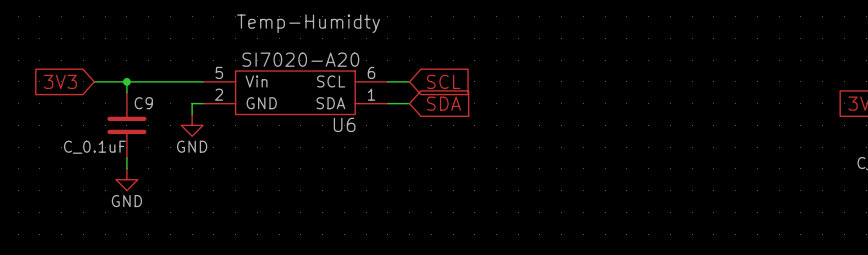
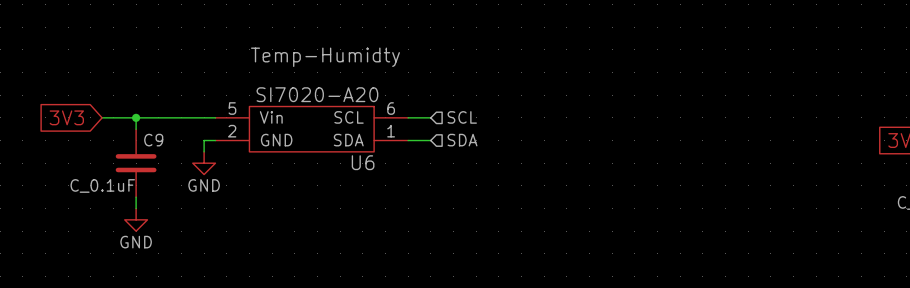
hierarchical label: none -> SCL (462, 117)
global label: SCL (443, 81) -> none
hierarchical label: none -> SDA (462, 140)
global label: SDA (444, 103) -> none

